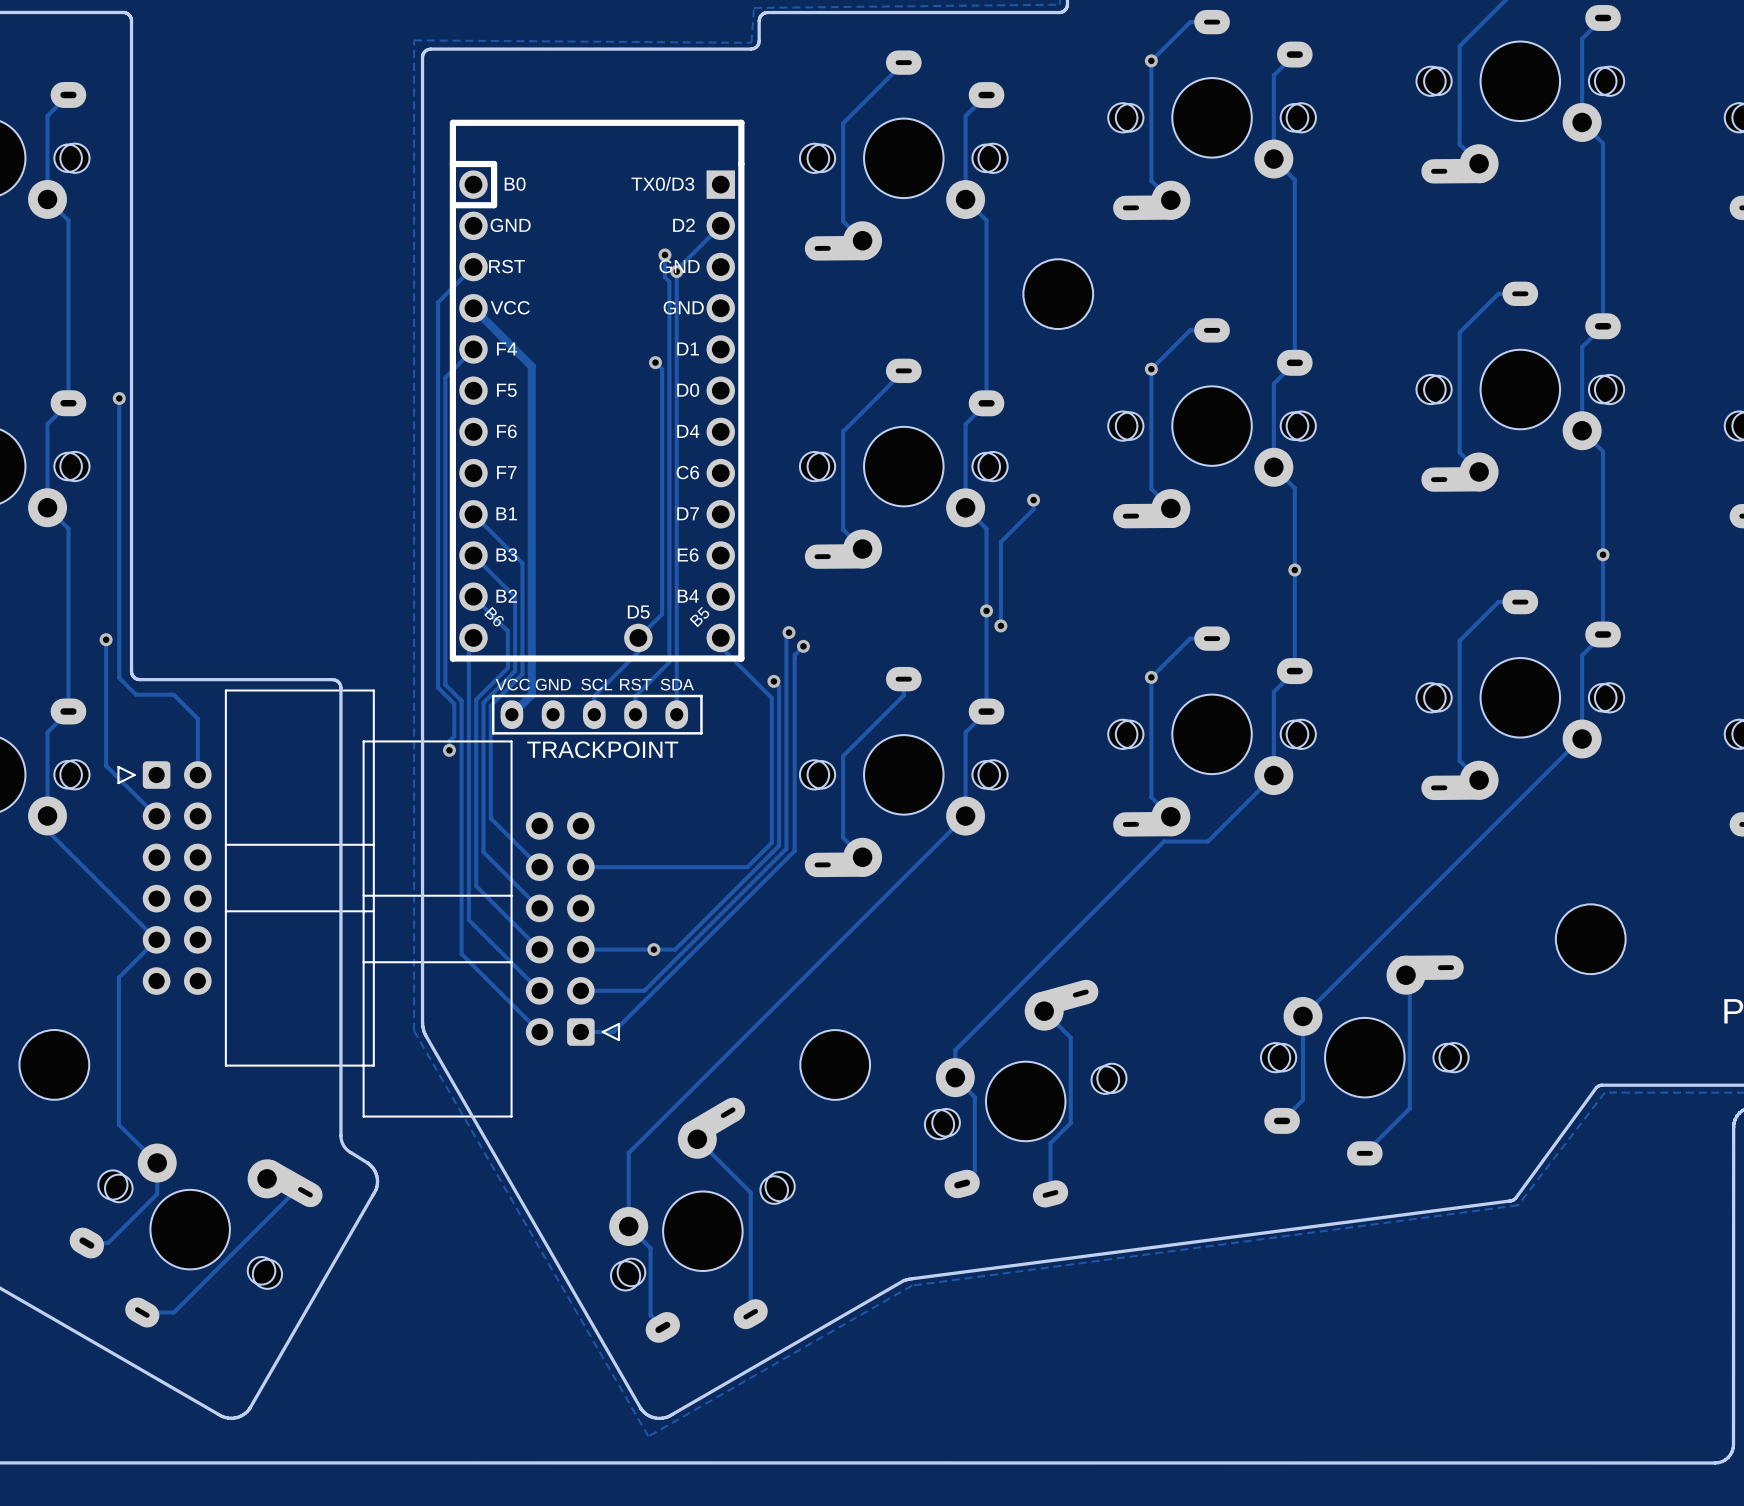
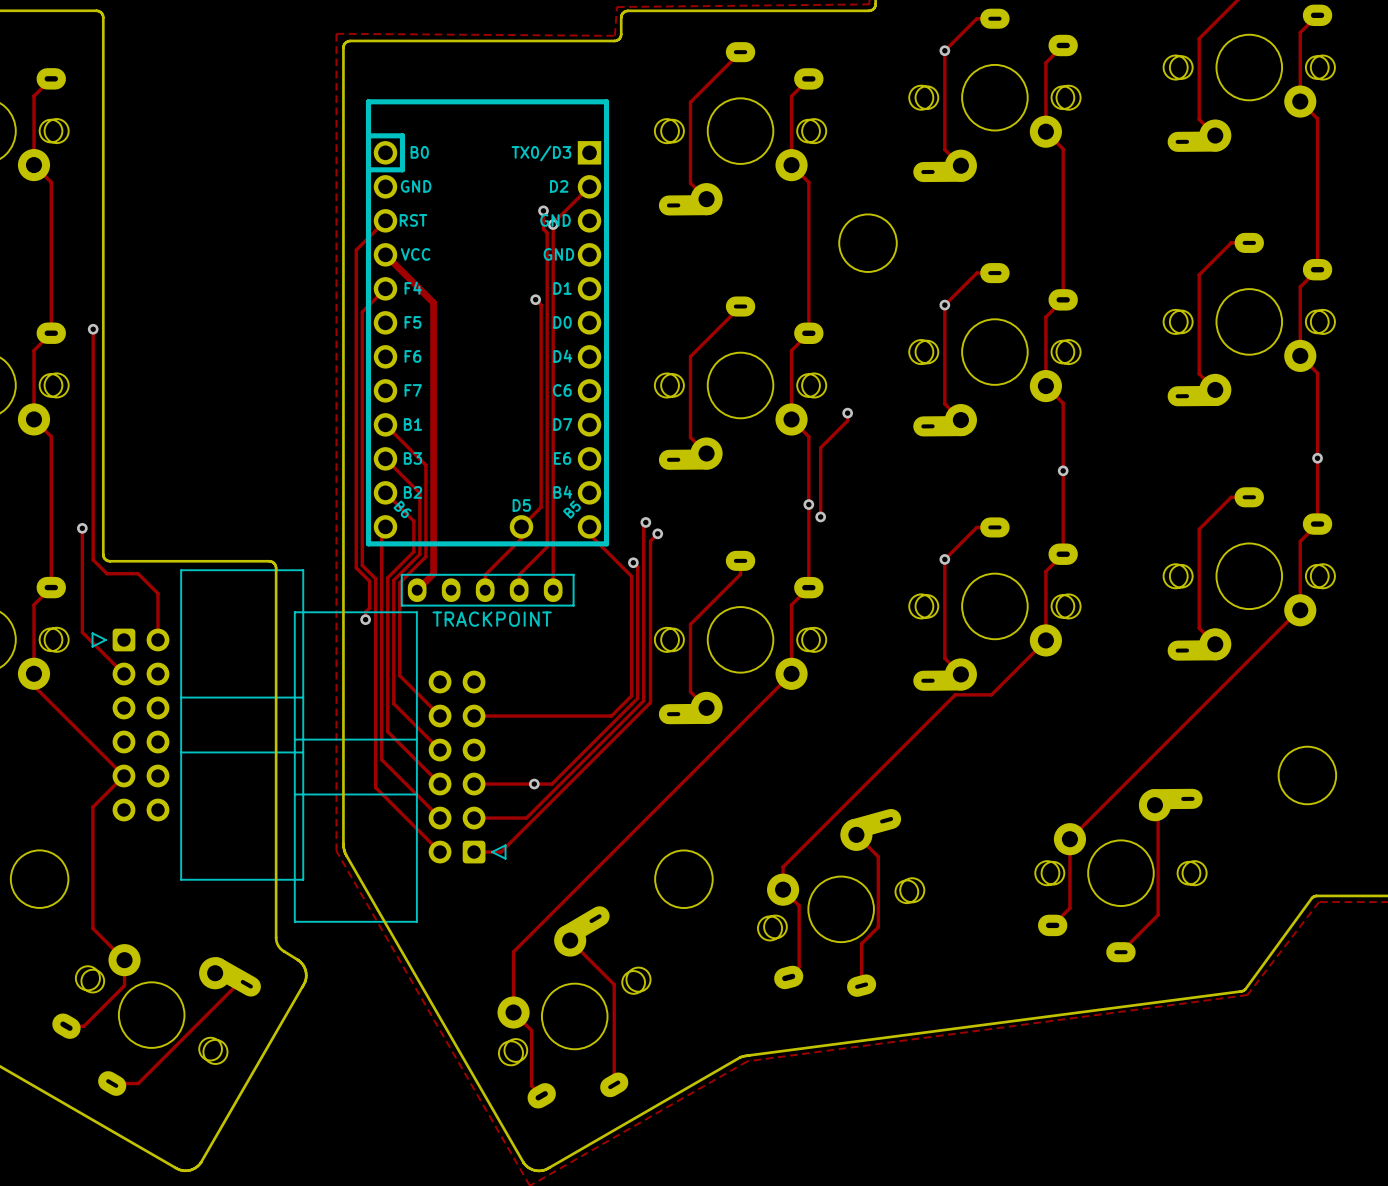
text: VCC (512, 684) -> none
text: GND (553, 684) -> none
text: SCL (596, 684) -> none
text: RST (635, 684) -> none
text: SDA (677, 684) -> none

